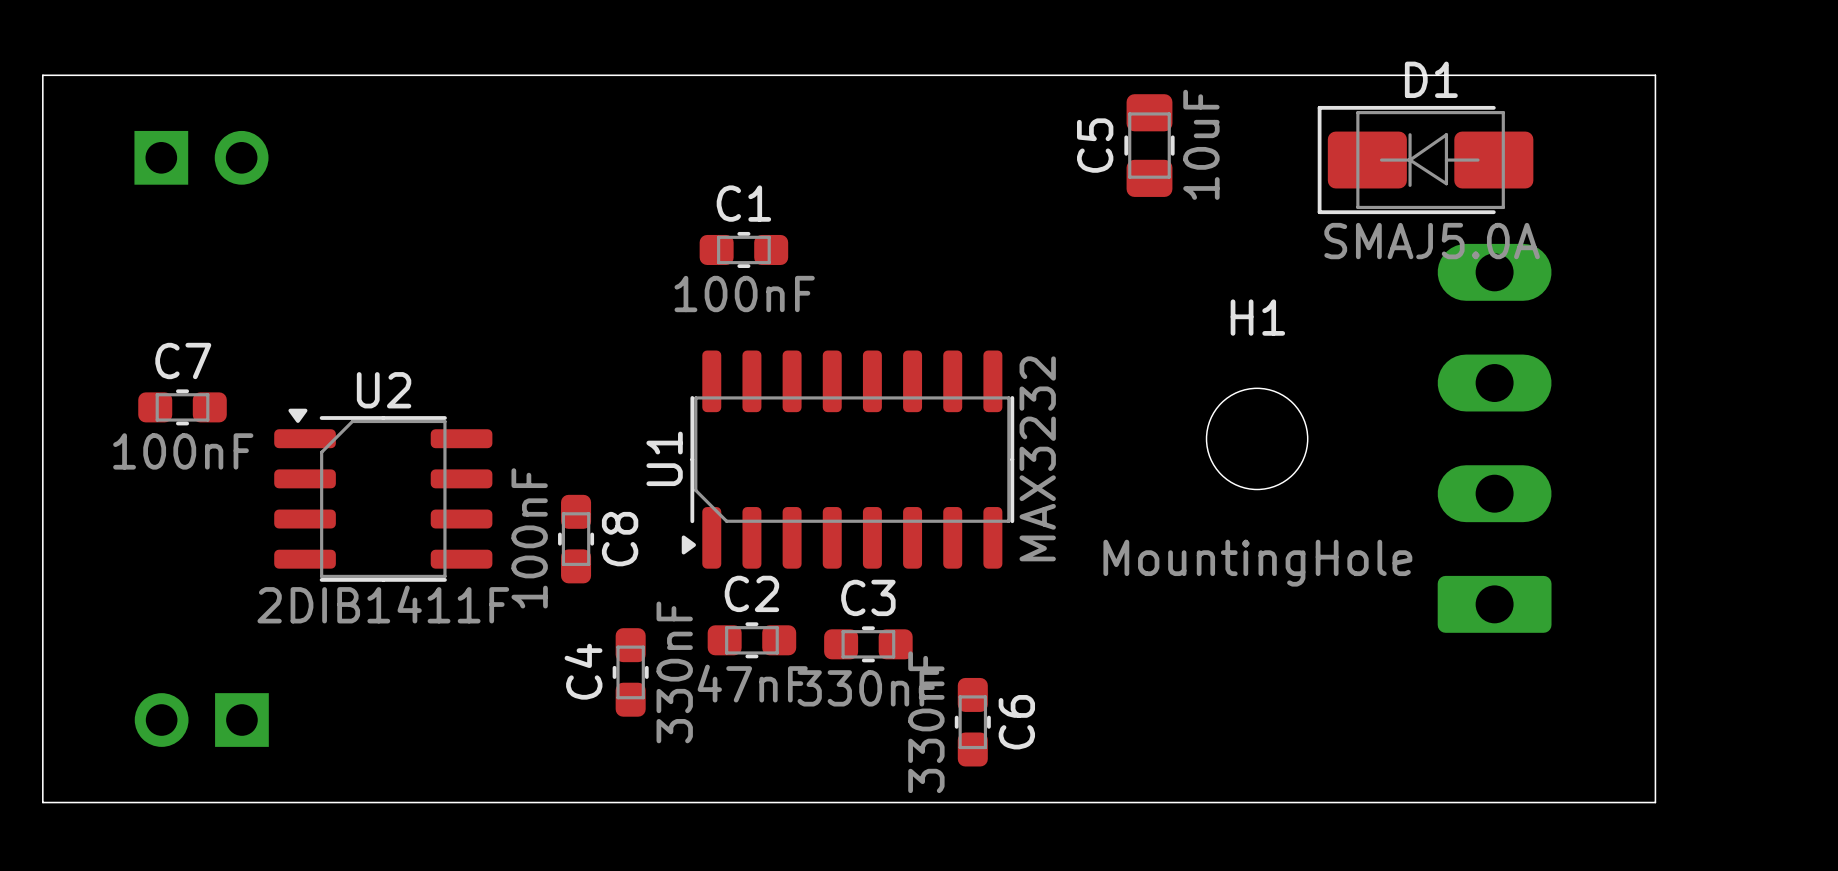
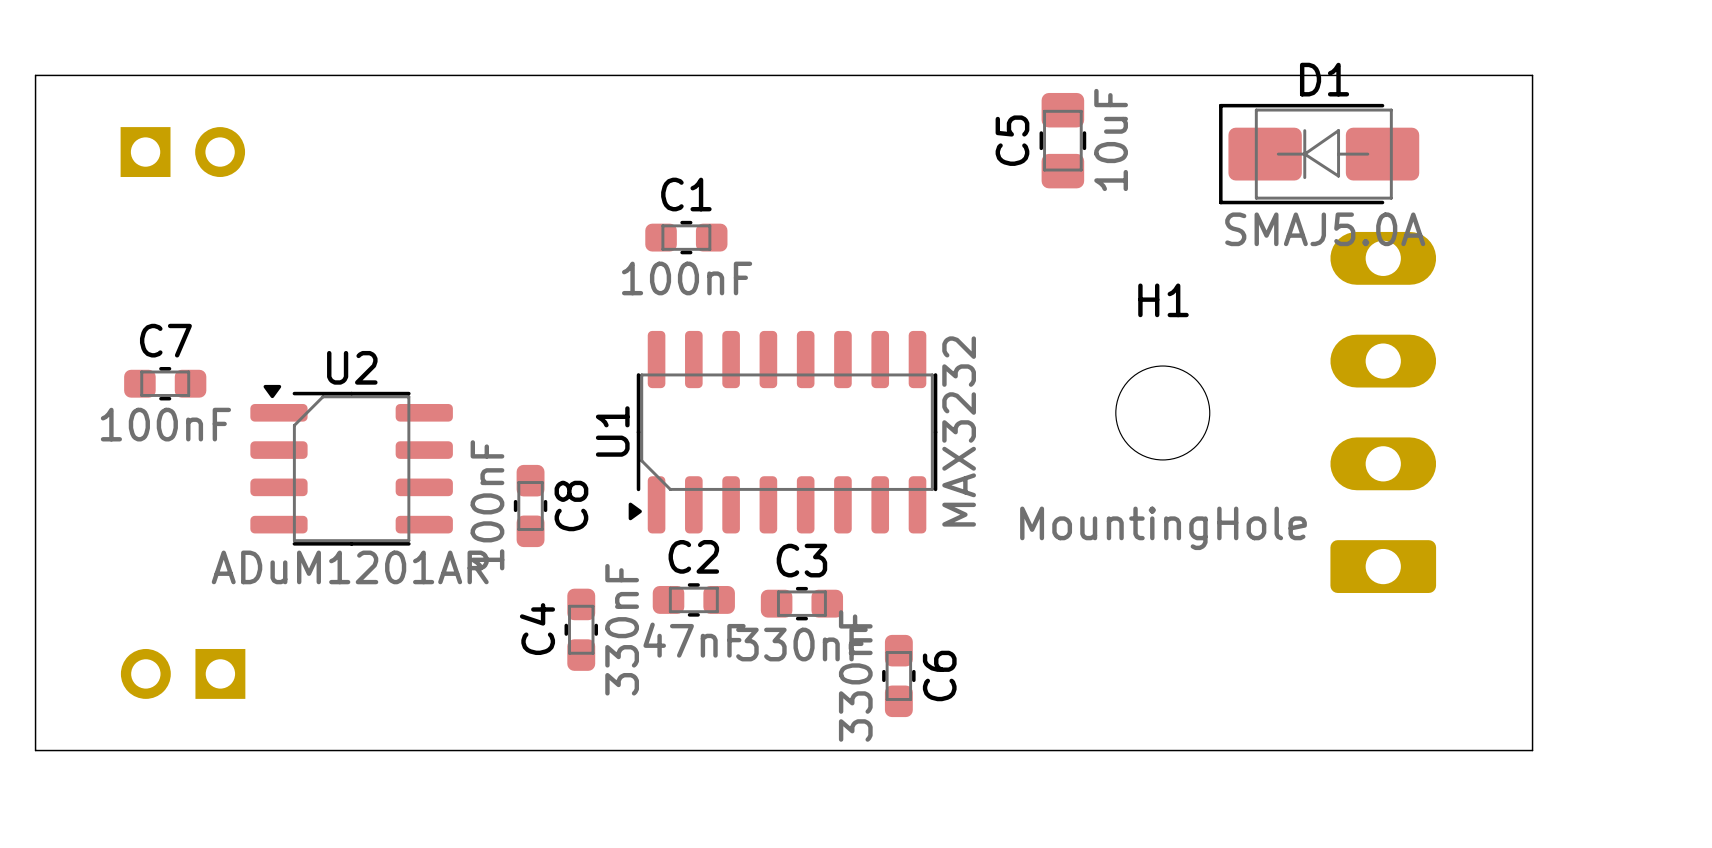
U2 value: 2DIB1411F (383, 604) -> ADuM1201AR (350, 567)

